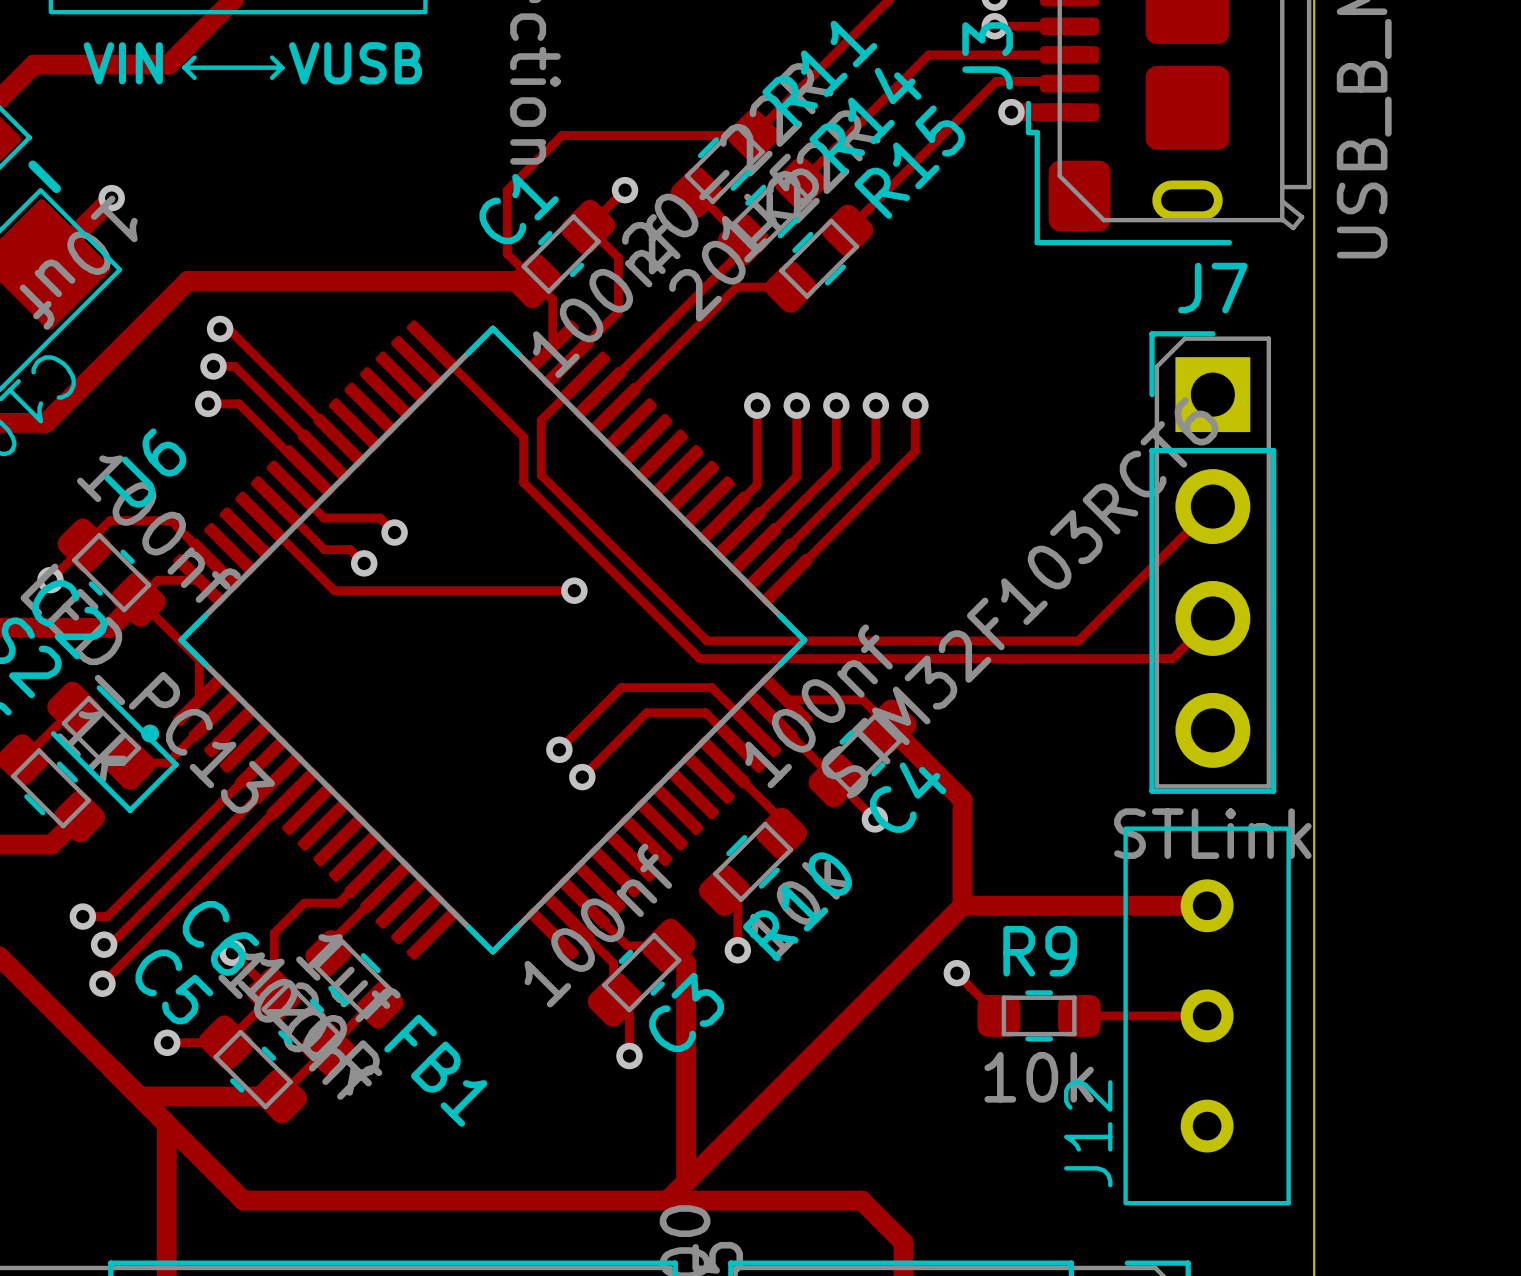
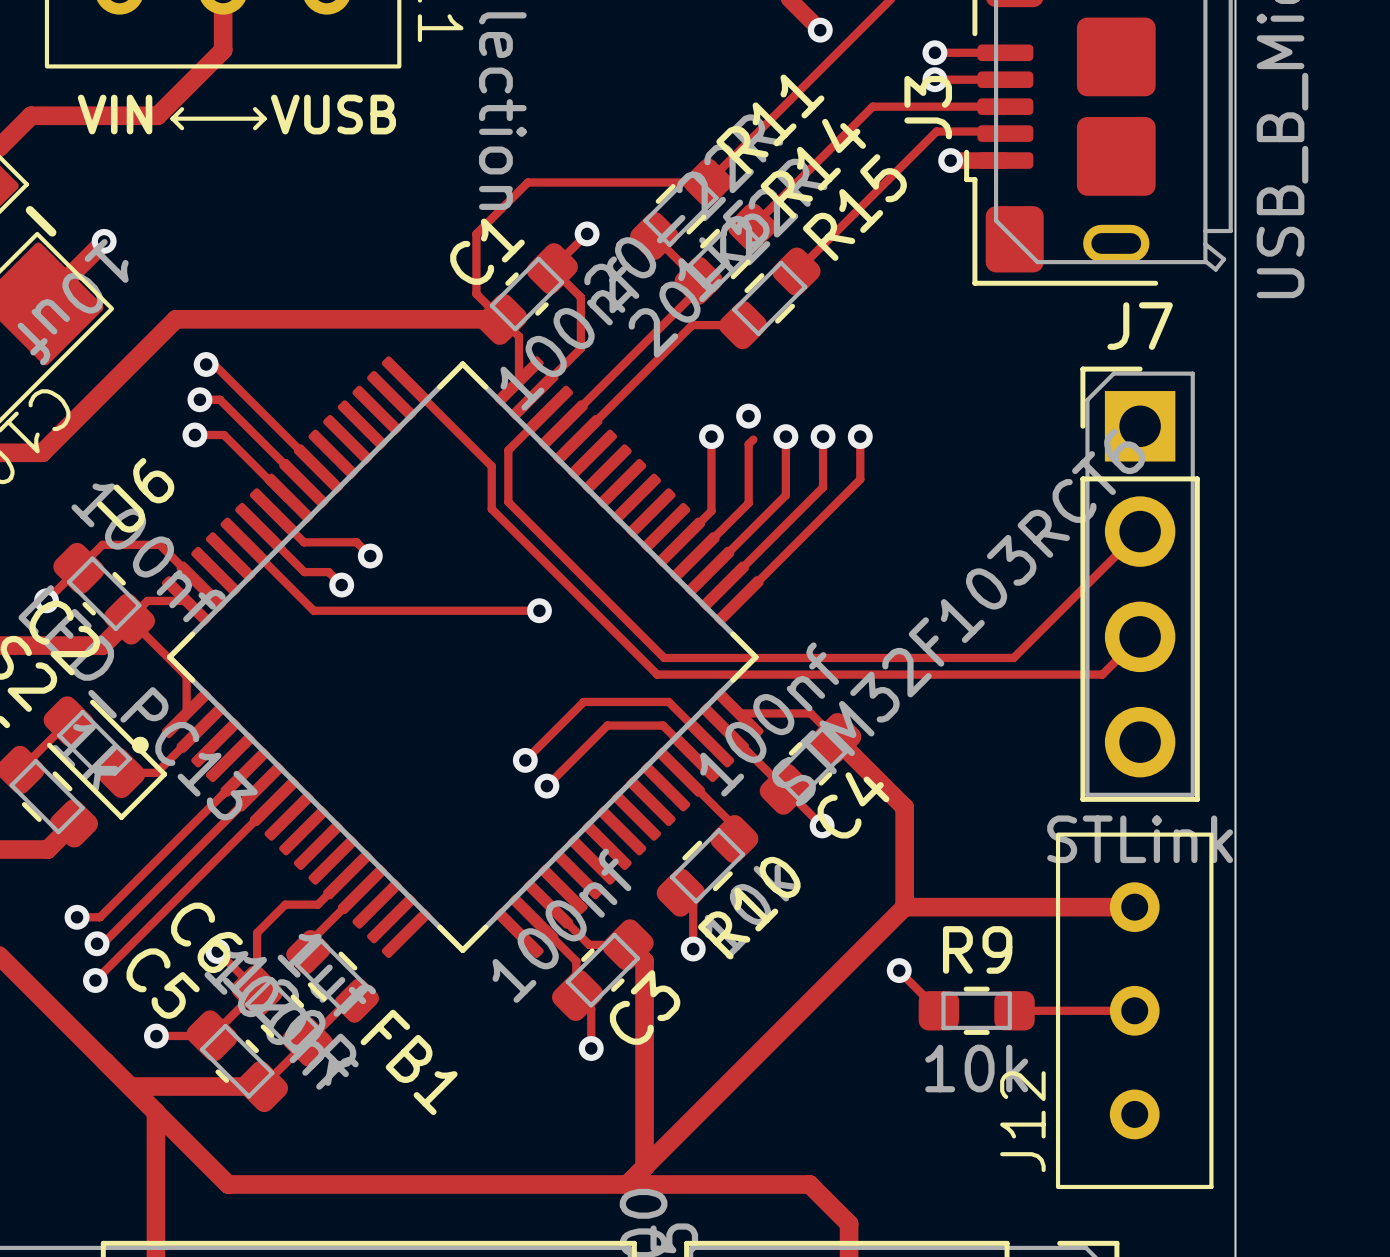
via position: (796, 405) -> (748, 416)

